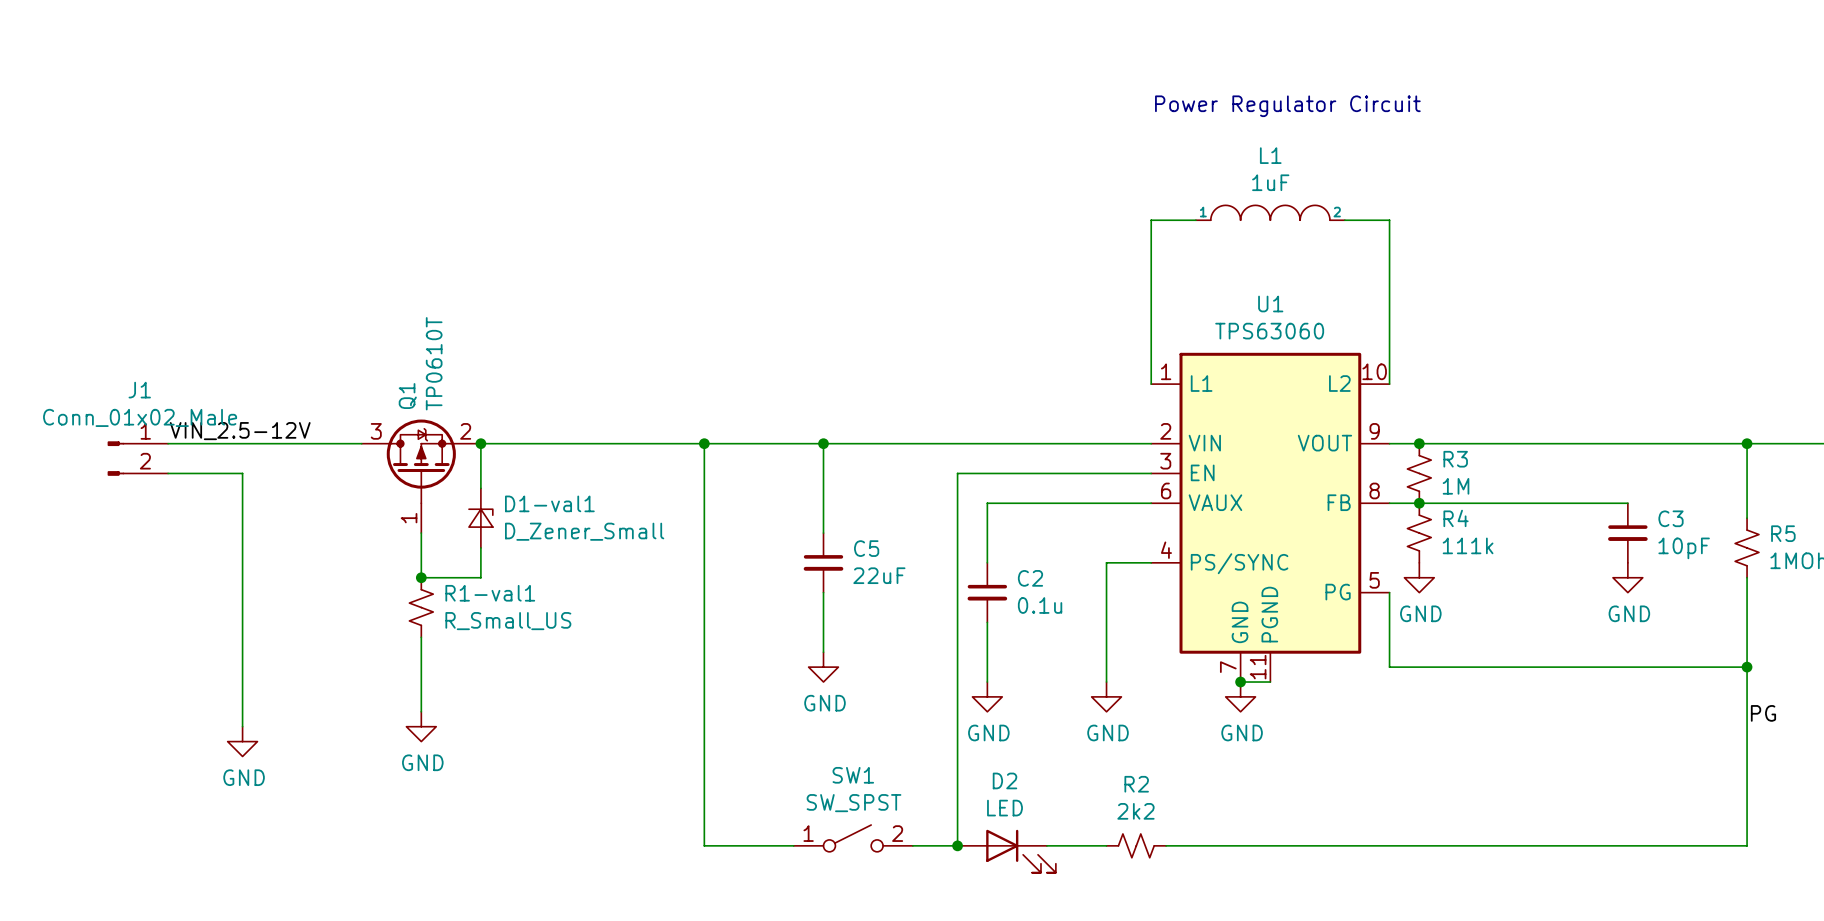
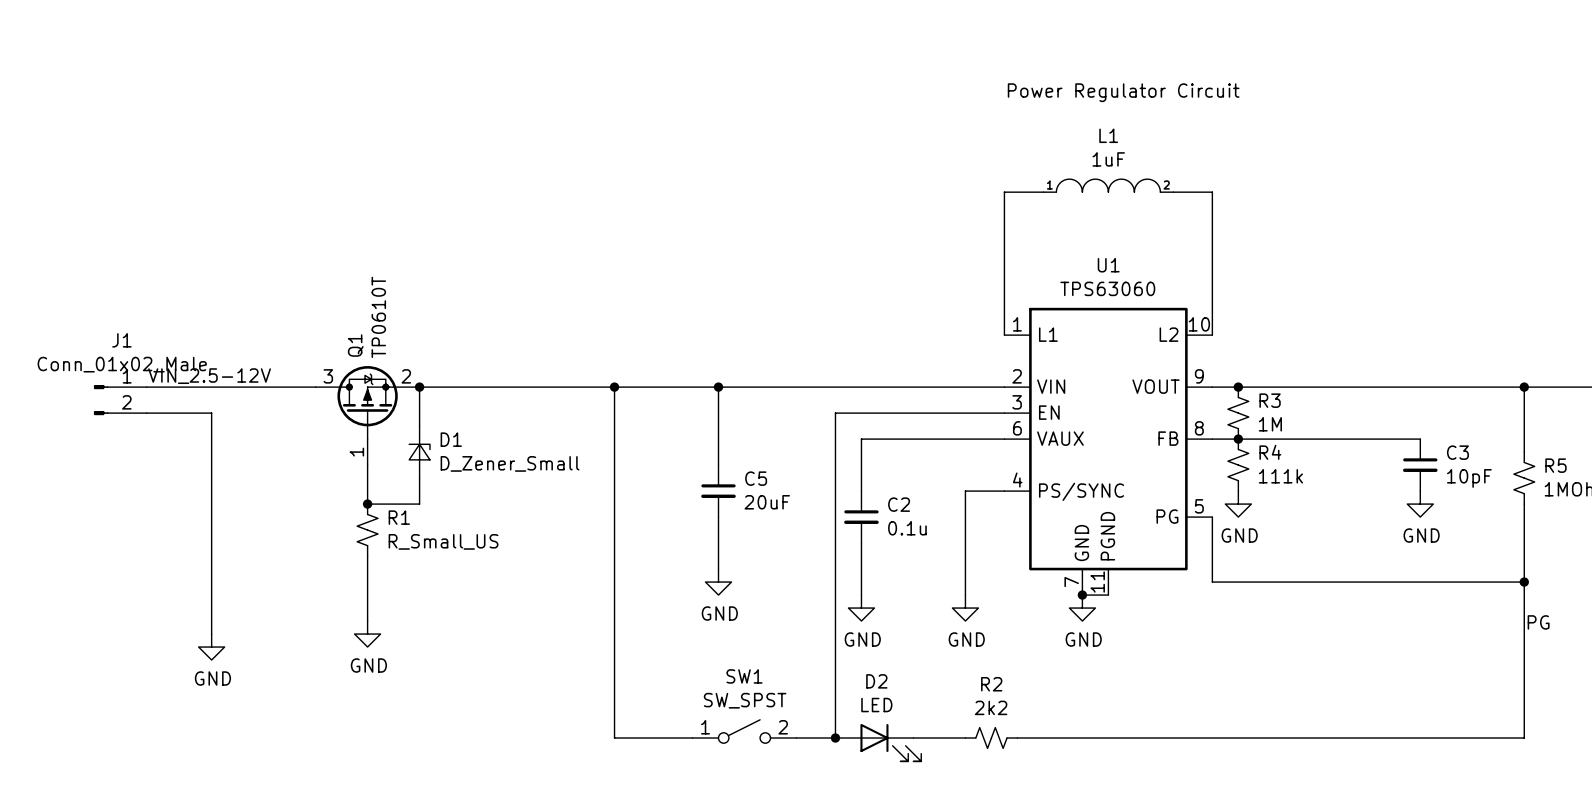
D1-val1 name: D1-val1 (549, 503) -> D1 (451, 439)
C5 value: 22uF (879, 575) -> 20uF (767, 502)
R1-val1 name: R1-val1 (490, 593) -> R1 (399, 517)

